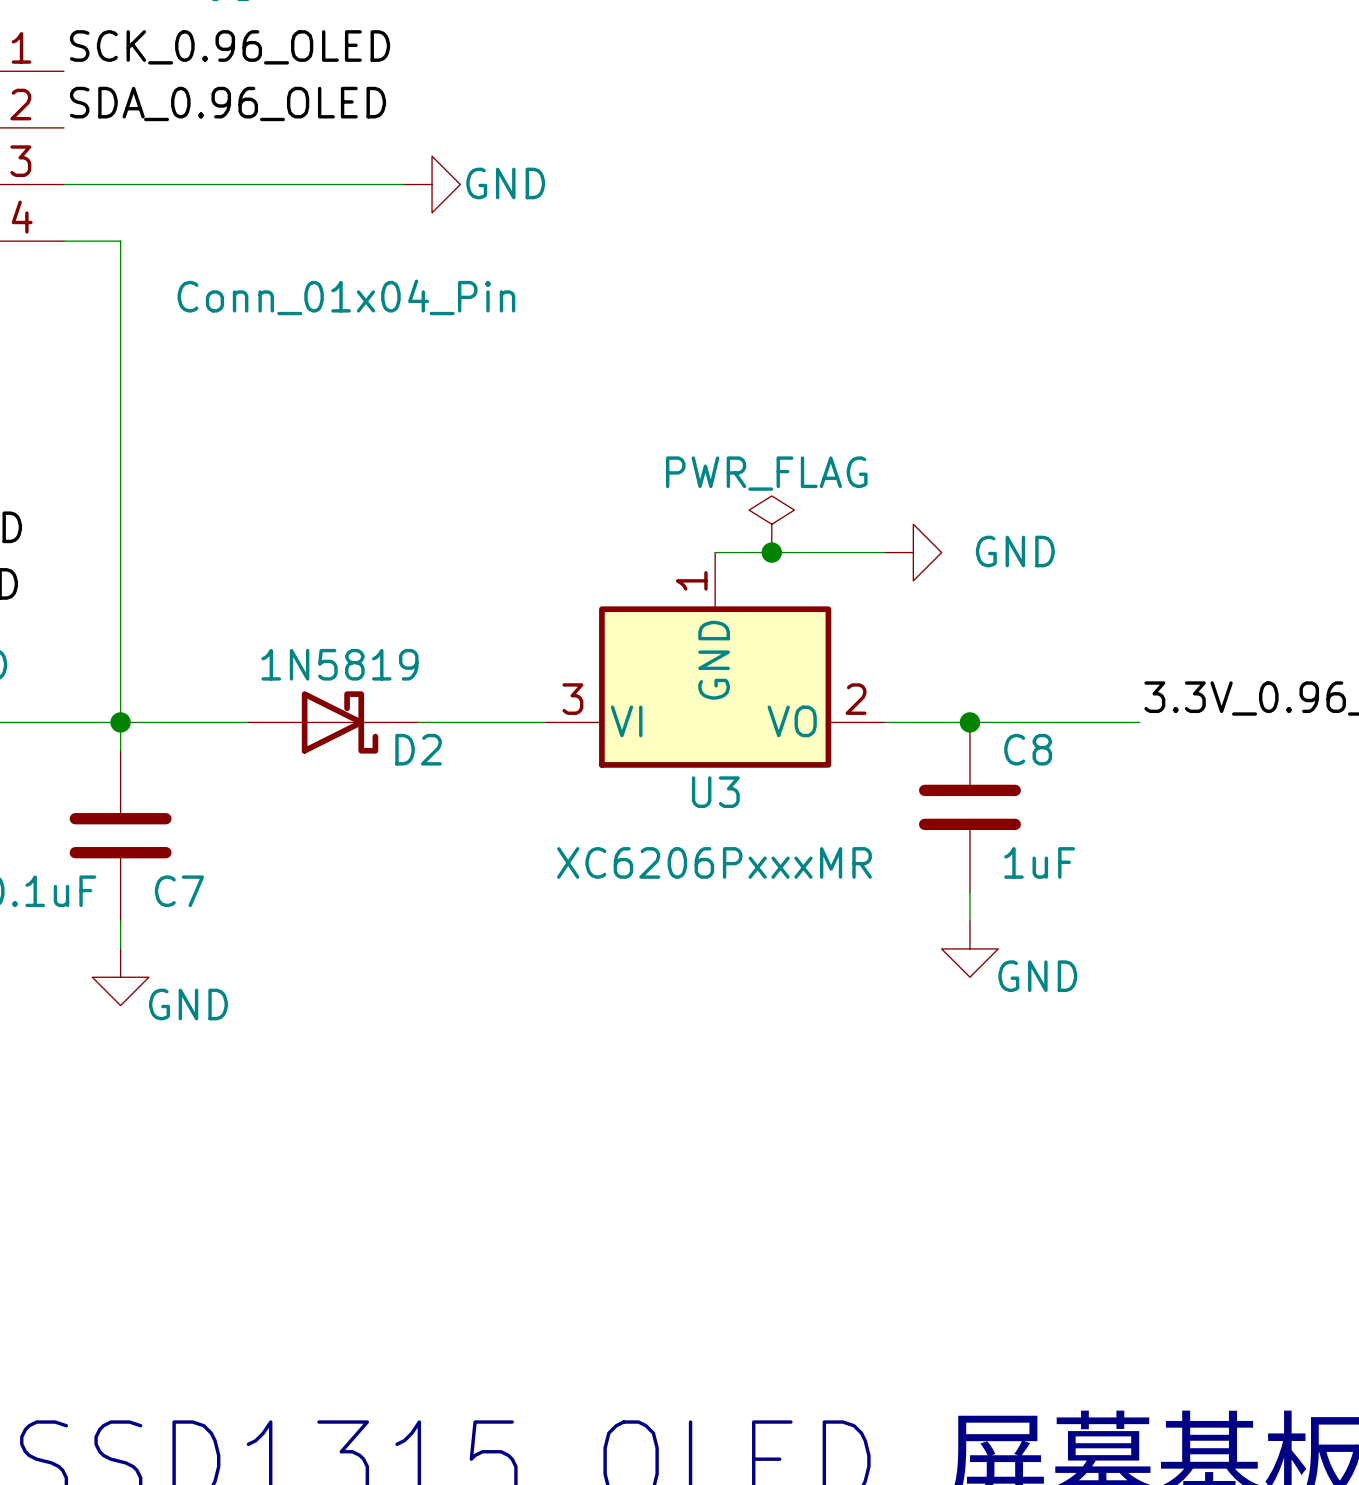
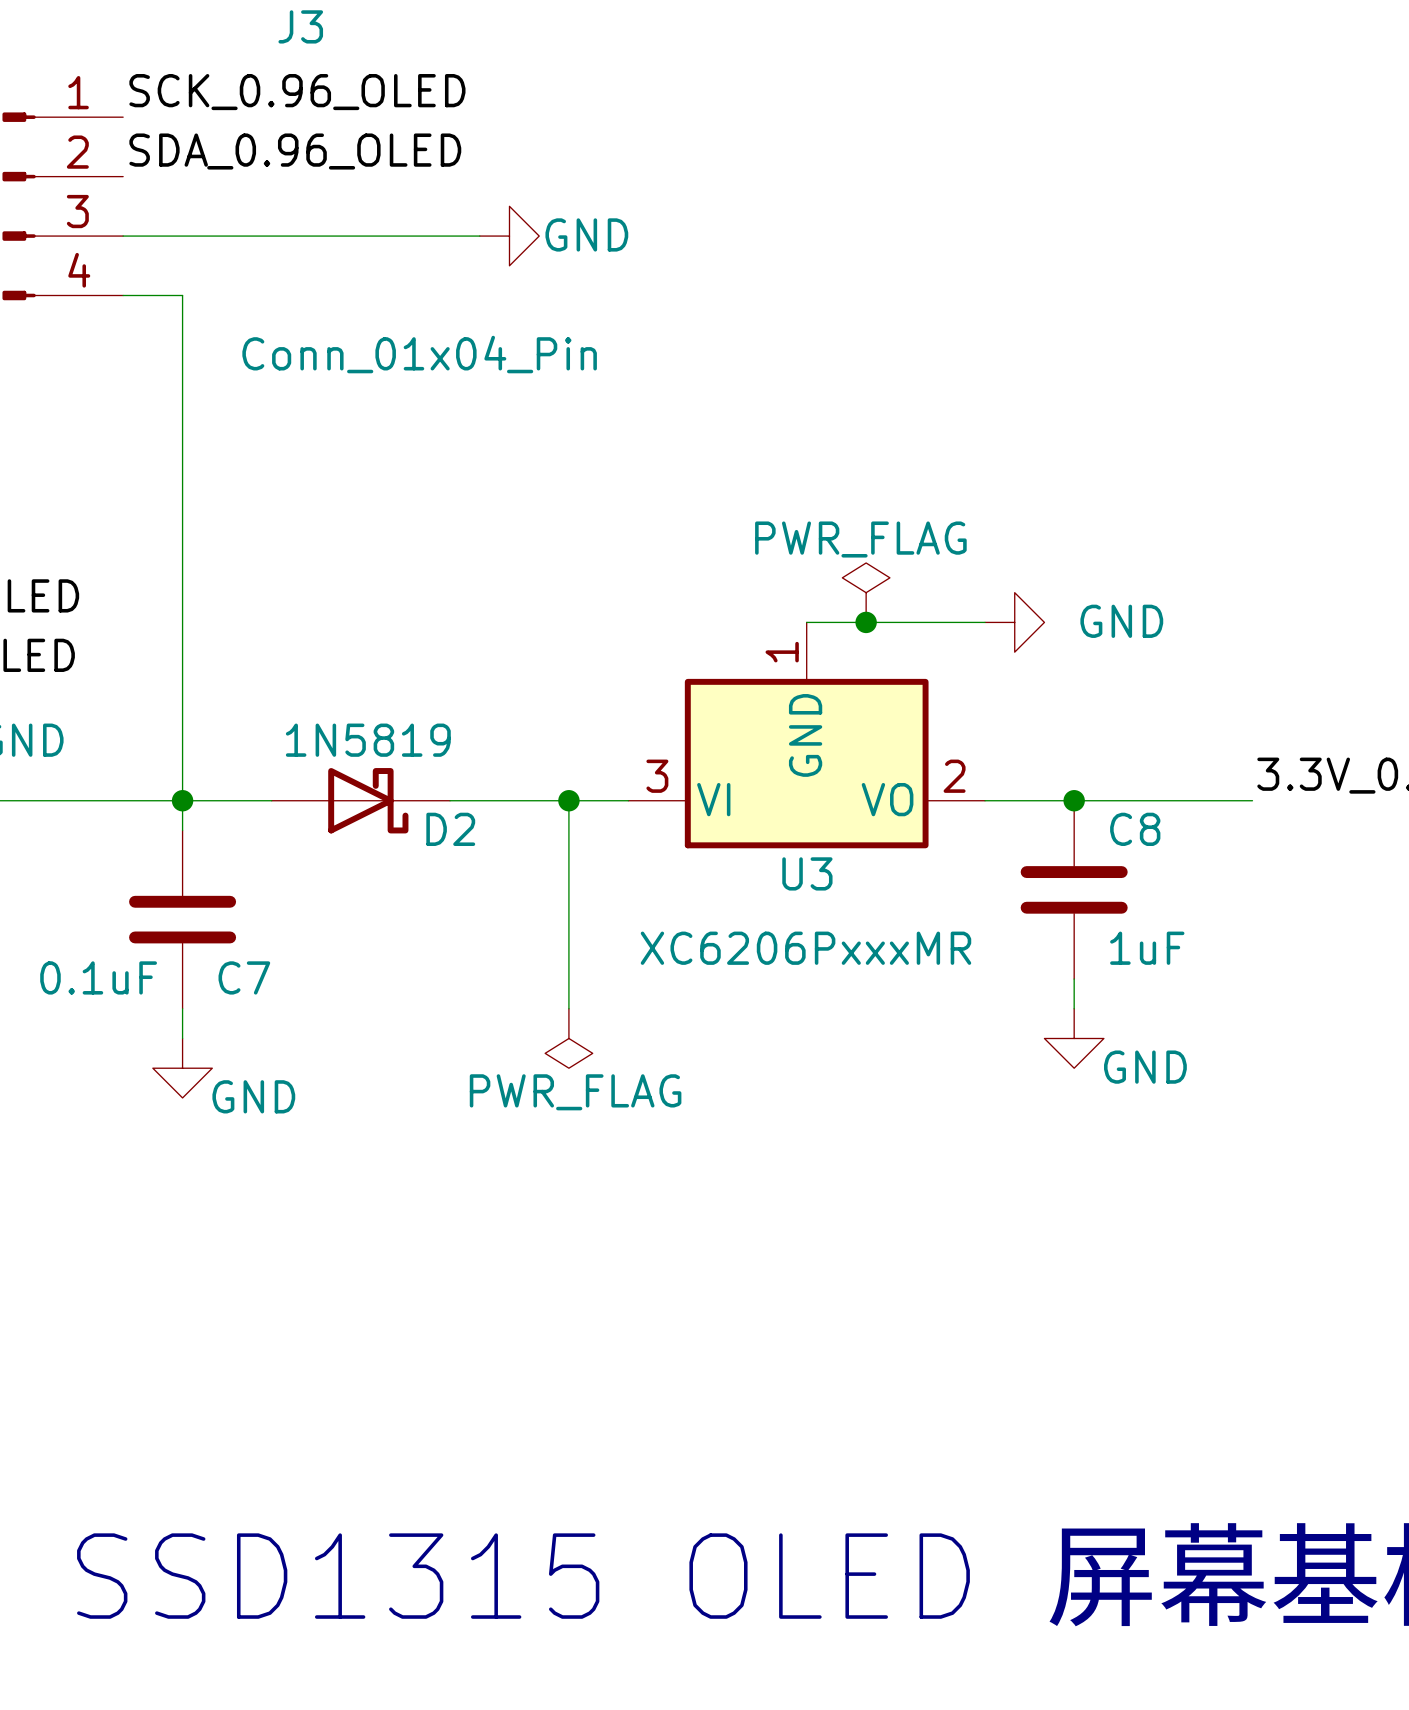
D2 position: (332, 722) -> (360, 800)
wire: none -> (568, 800) (568, 1008)
junction: none -> (568, 800)
power symbol: none -> PWR_FLAG (568, 1038)

